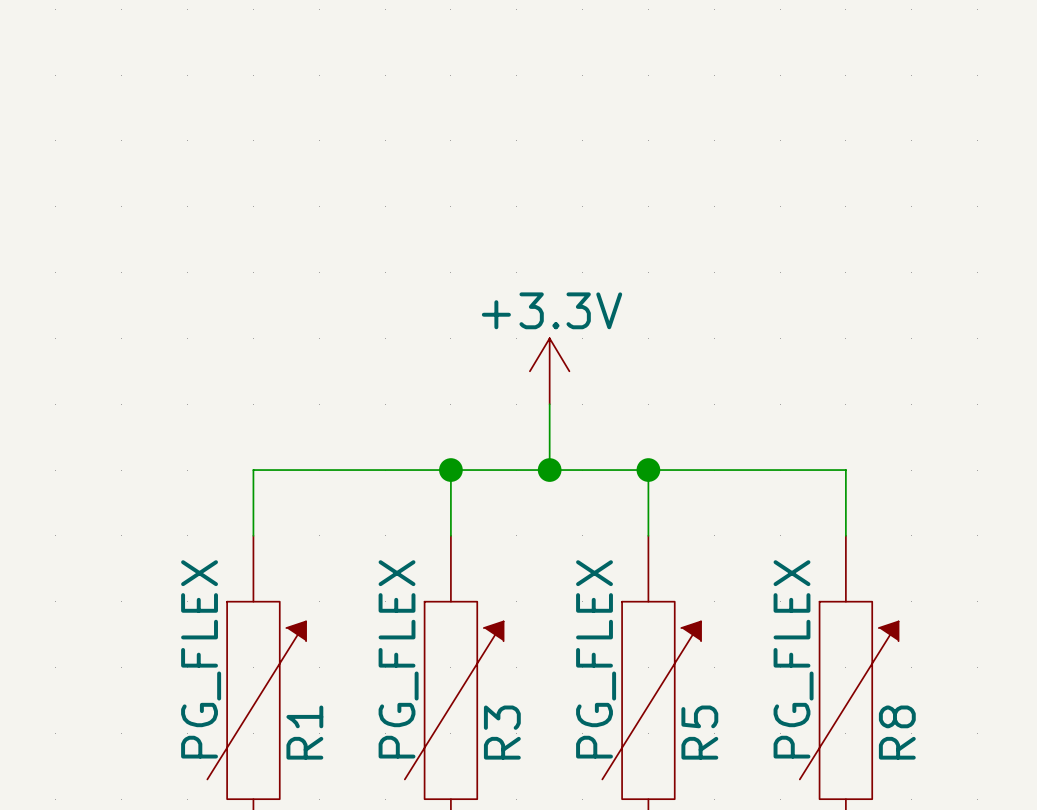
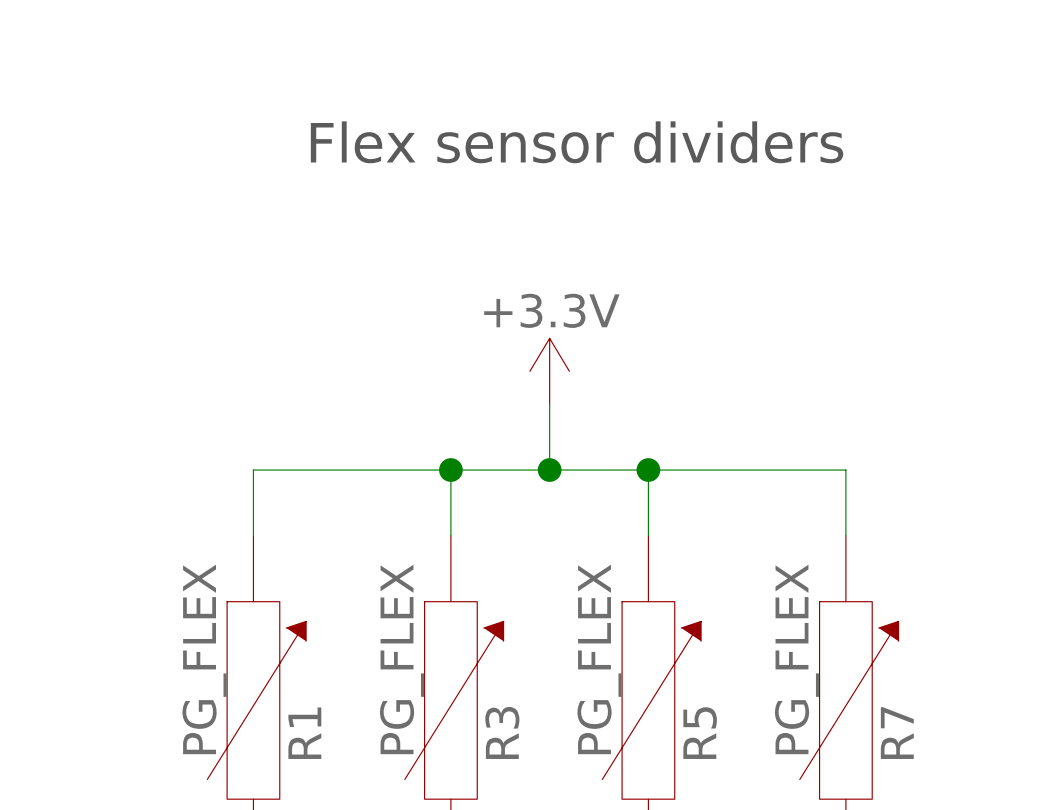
text: none -> Flex sensor dividers (577, 142)
R8 name: R8 (897, 732) -> R7 (897, 733)

